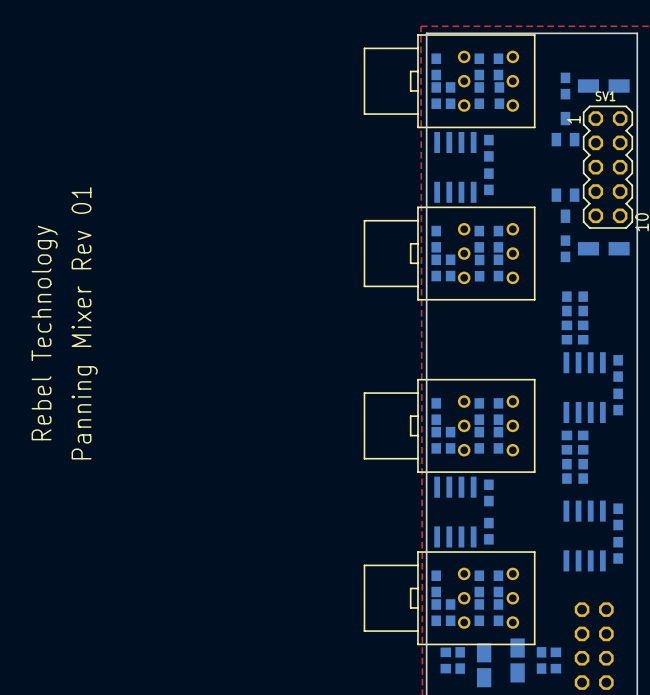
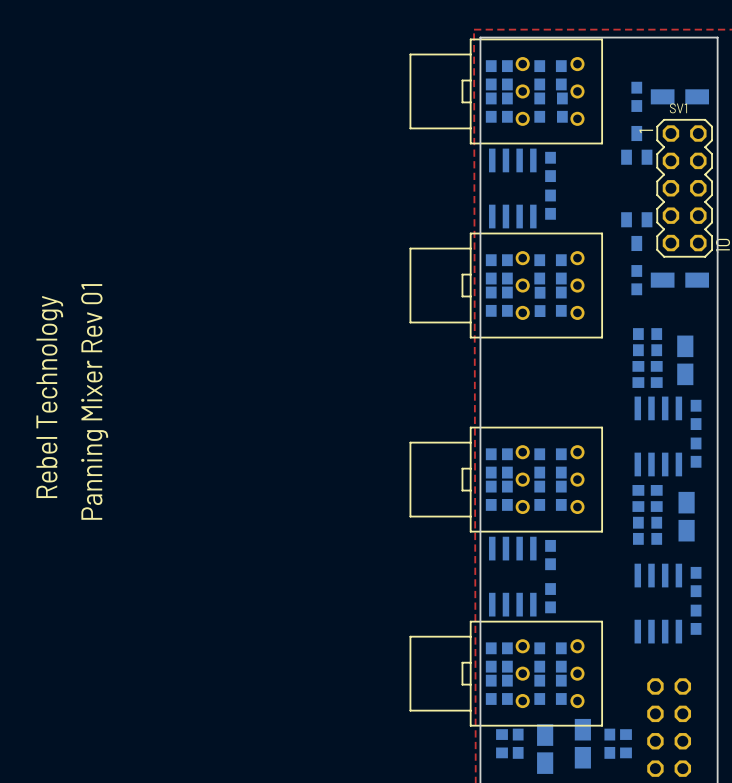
part: none -> (507, 75)
part: none -> (507, 269)
part: none -> (685, 360)
part: none -> (507, 463)
part: none -> (686, 516)
part: none -> (507, 657)

